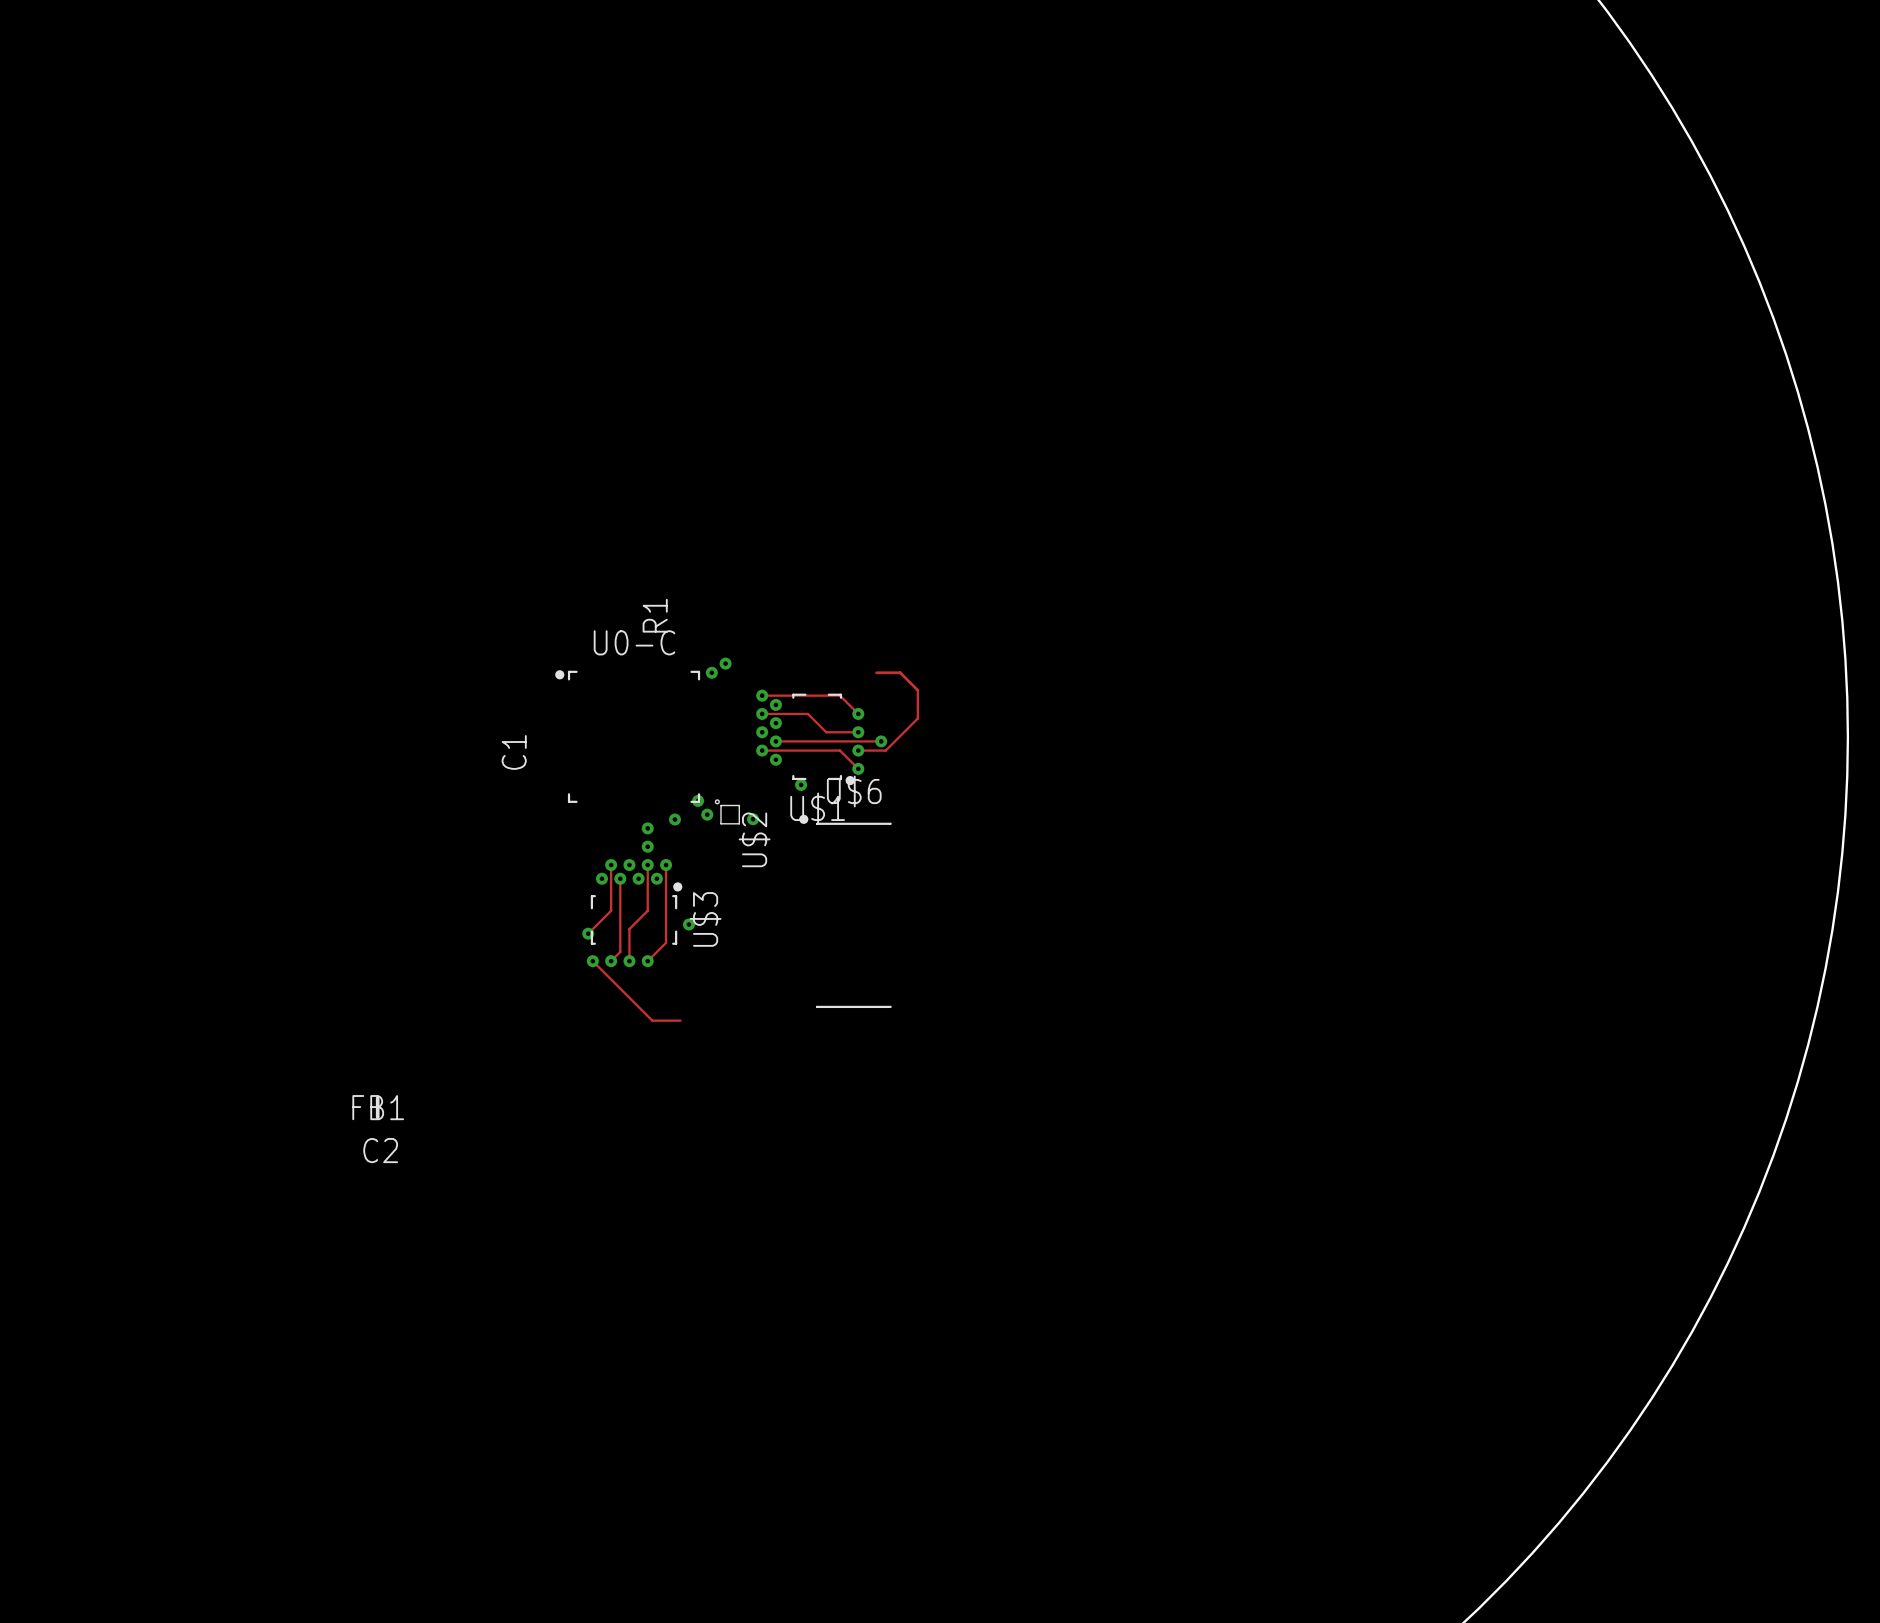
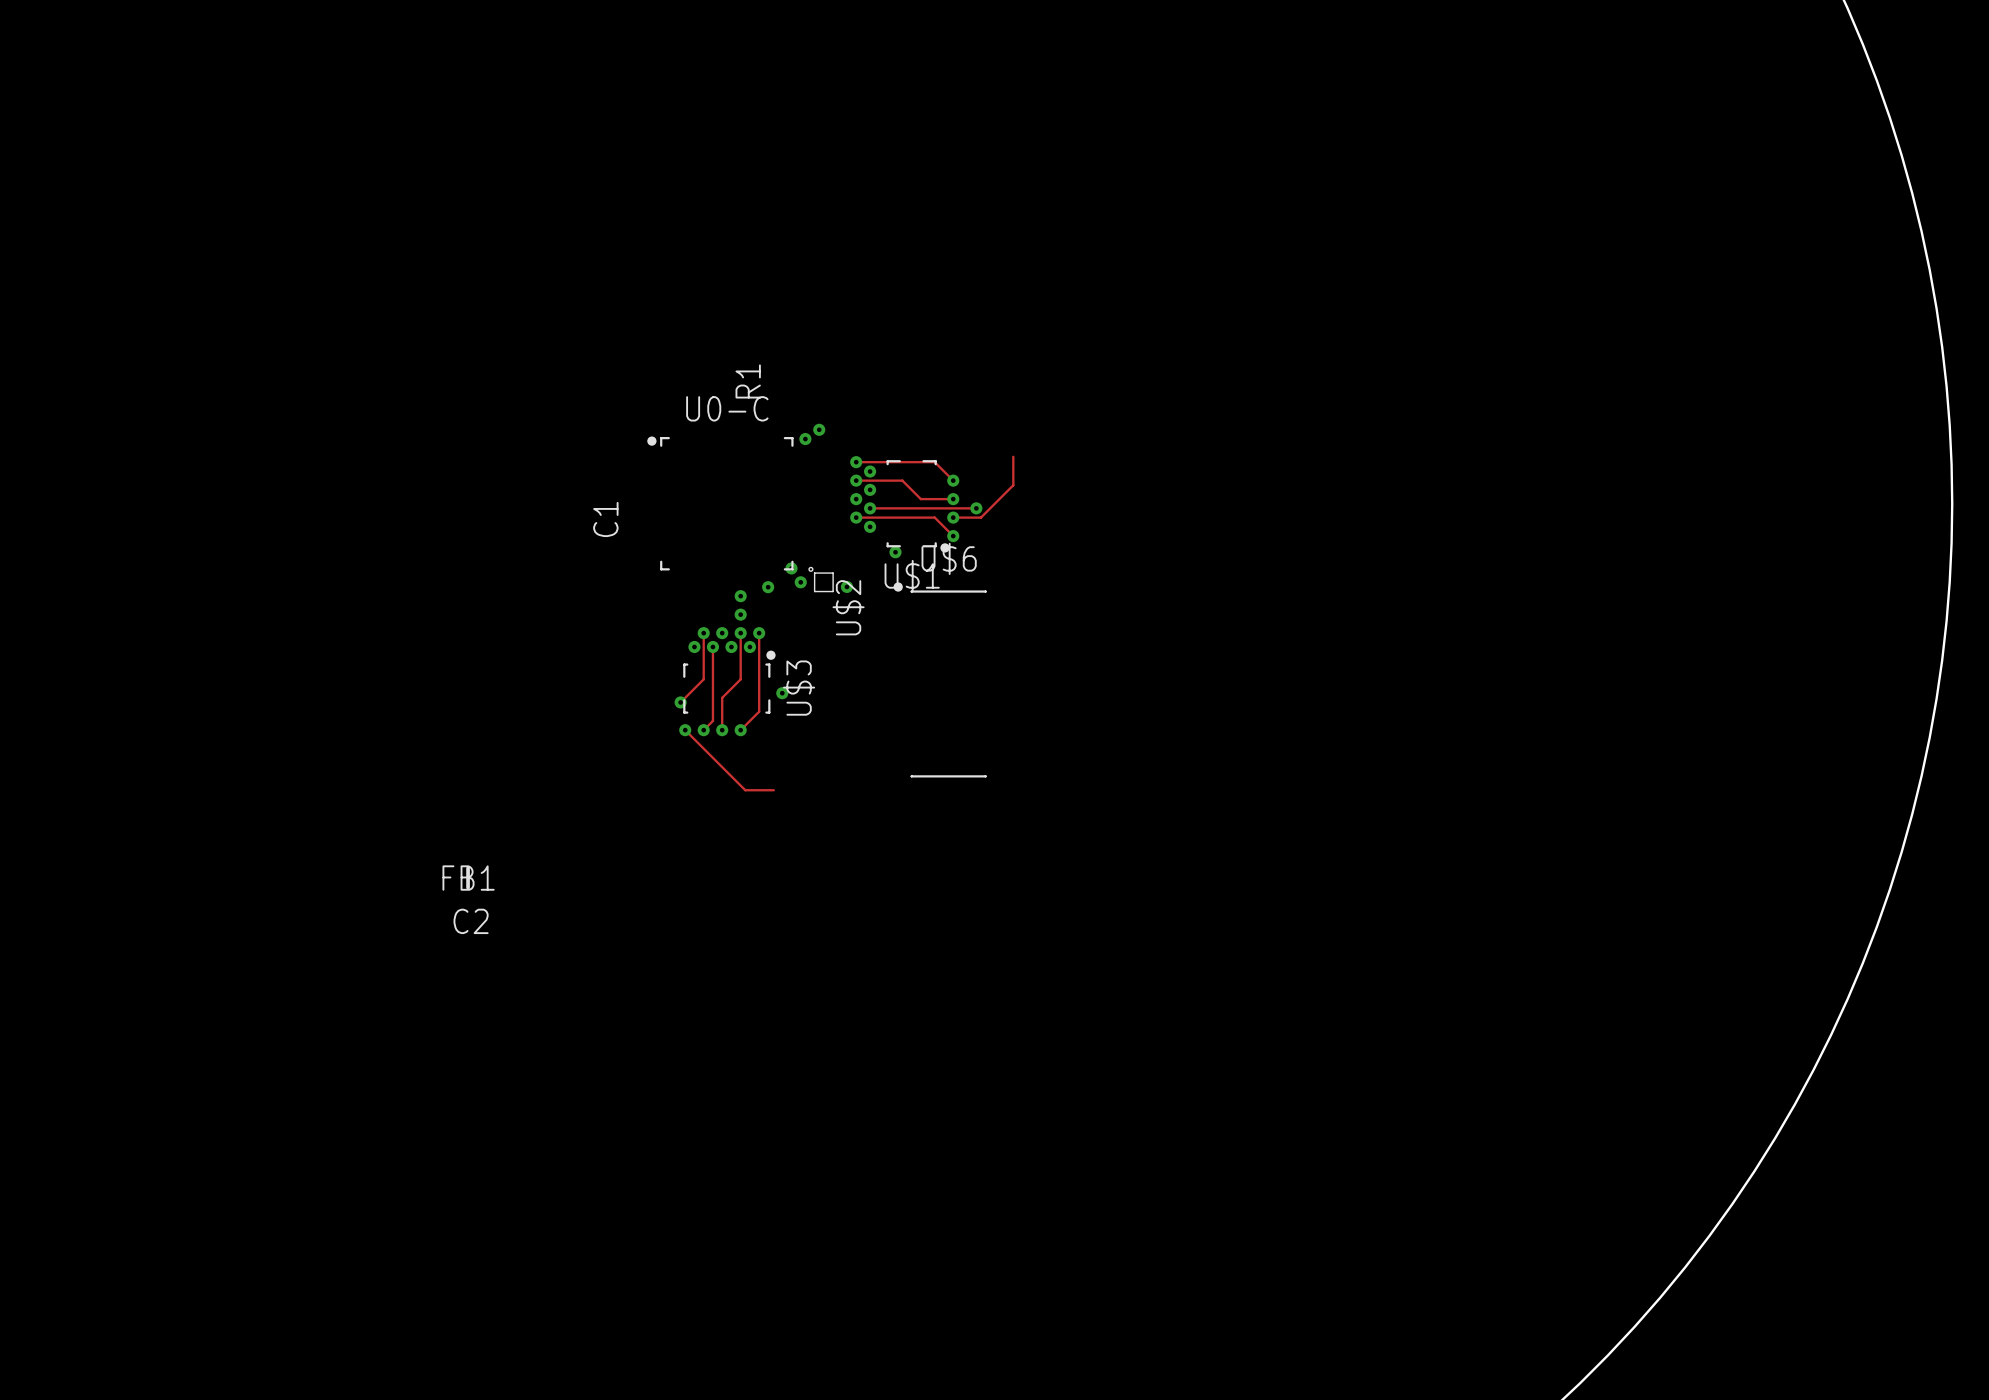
track: (876, 672) (900, 672) (917, 690) -> none

